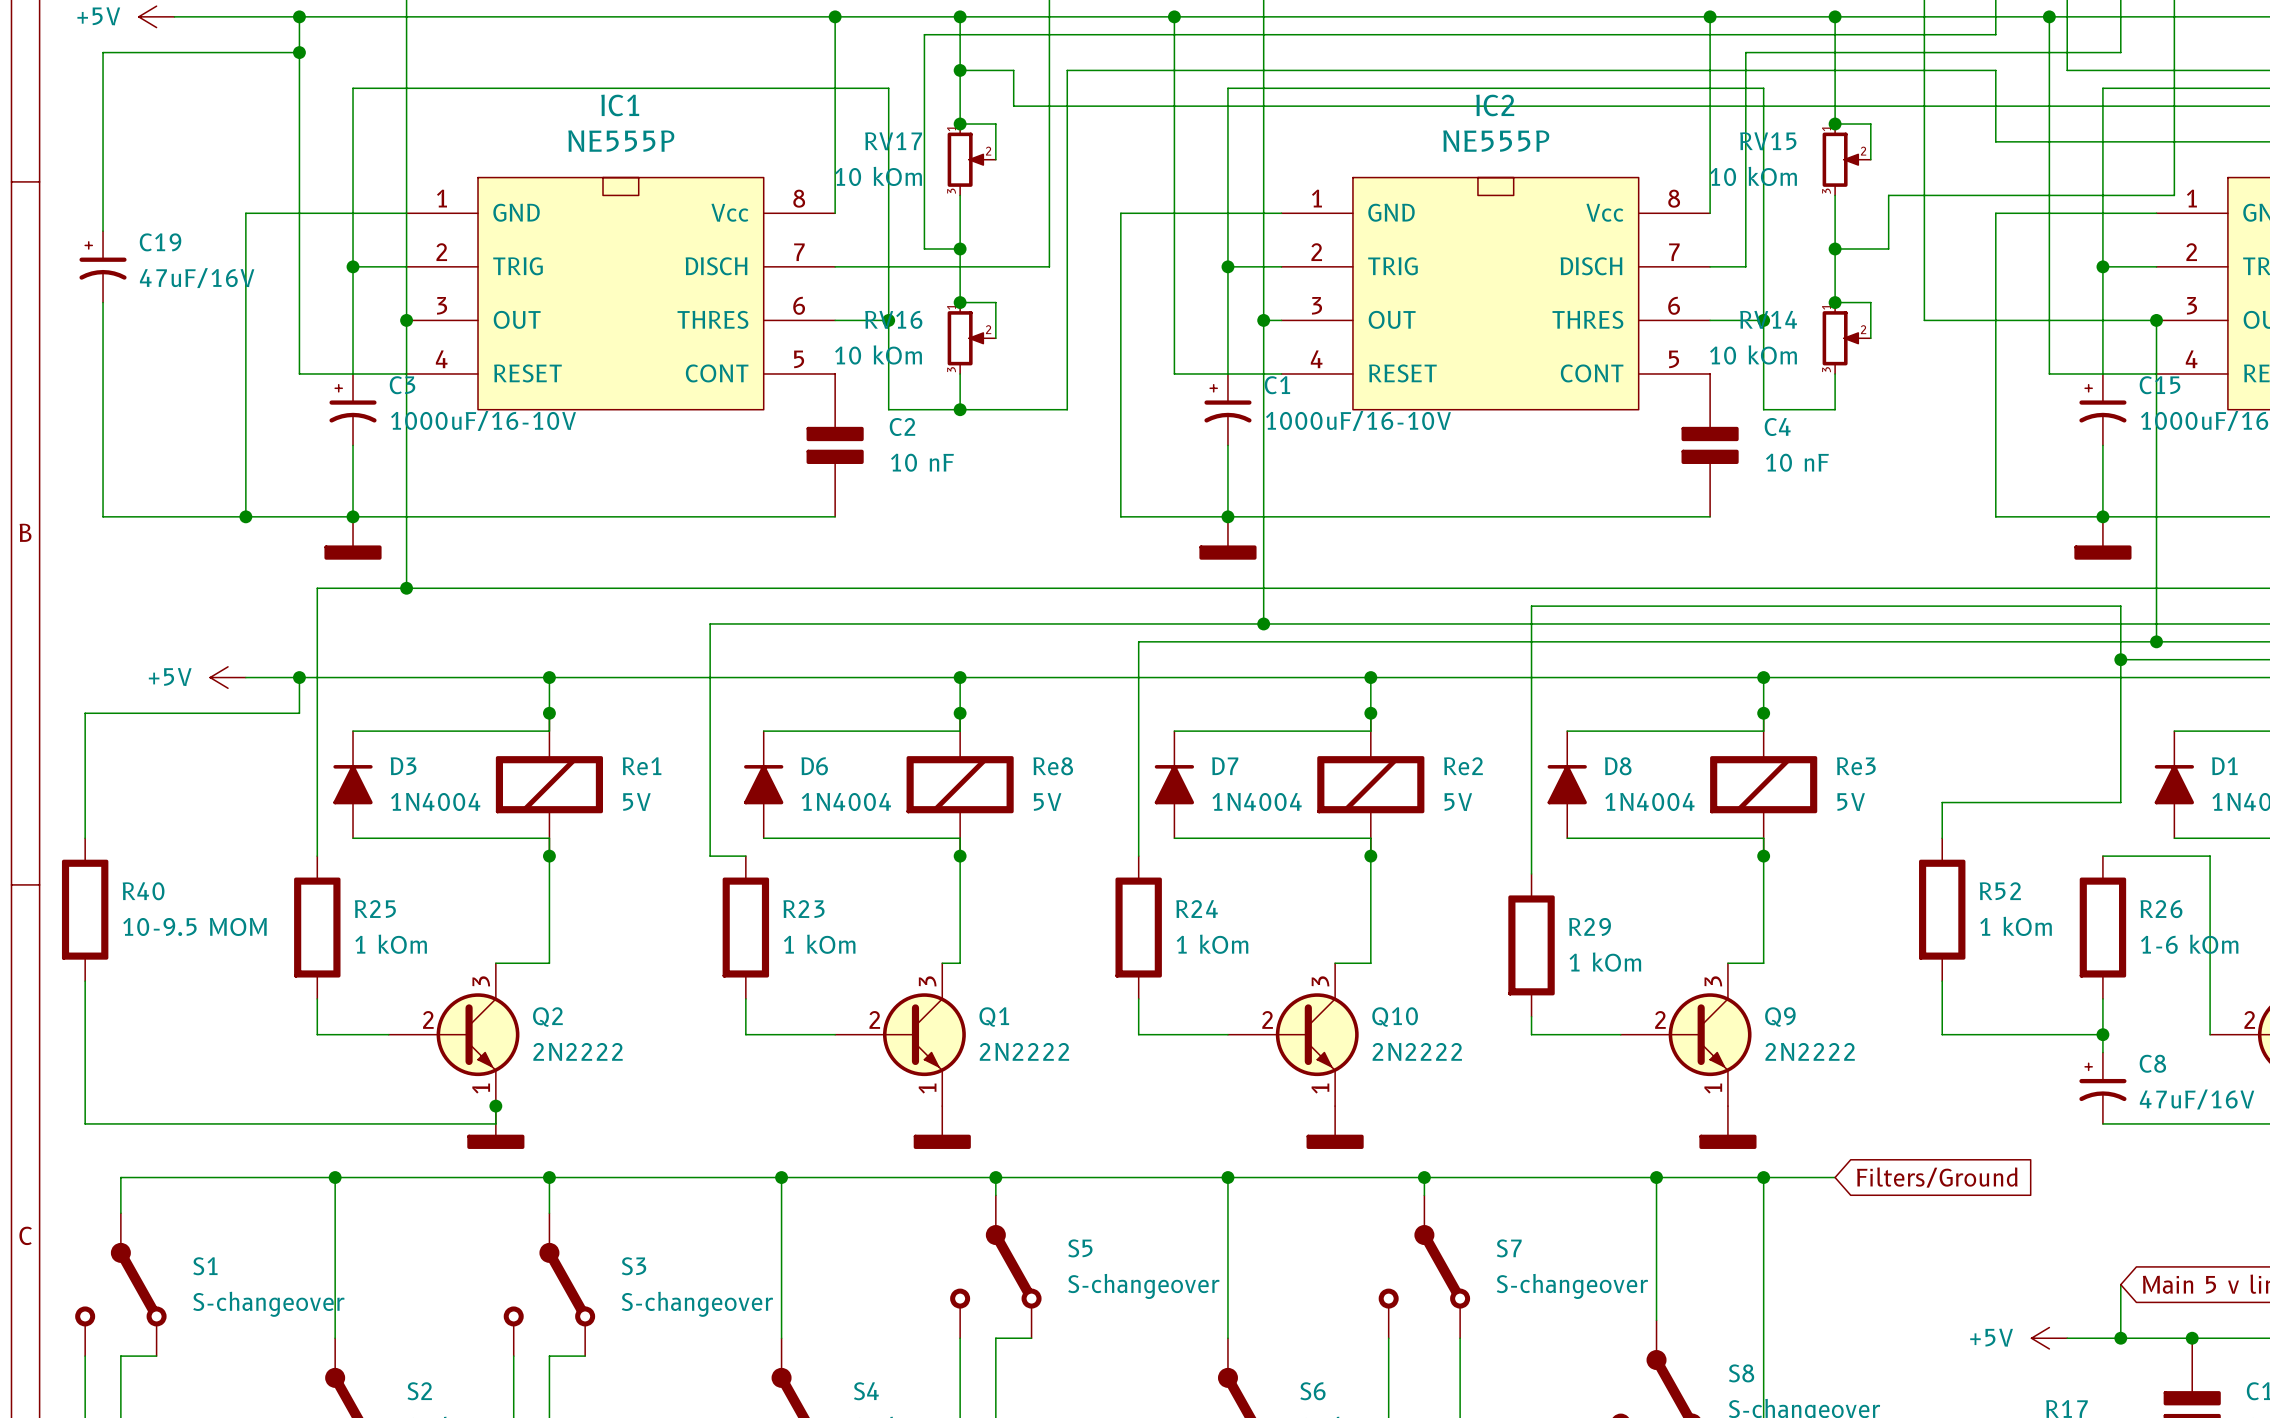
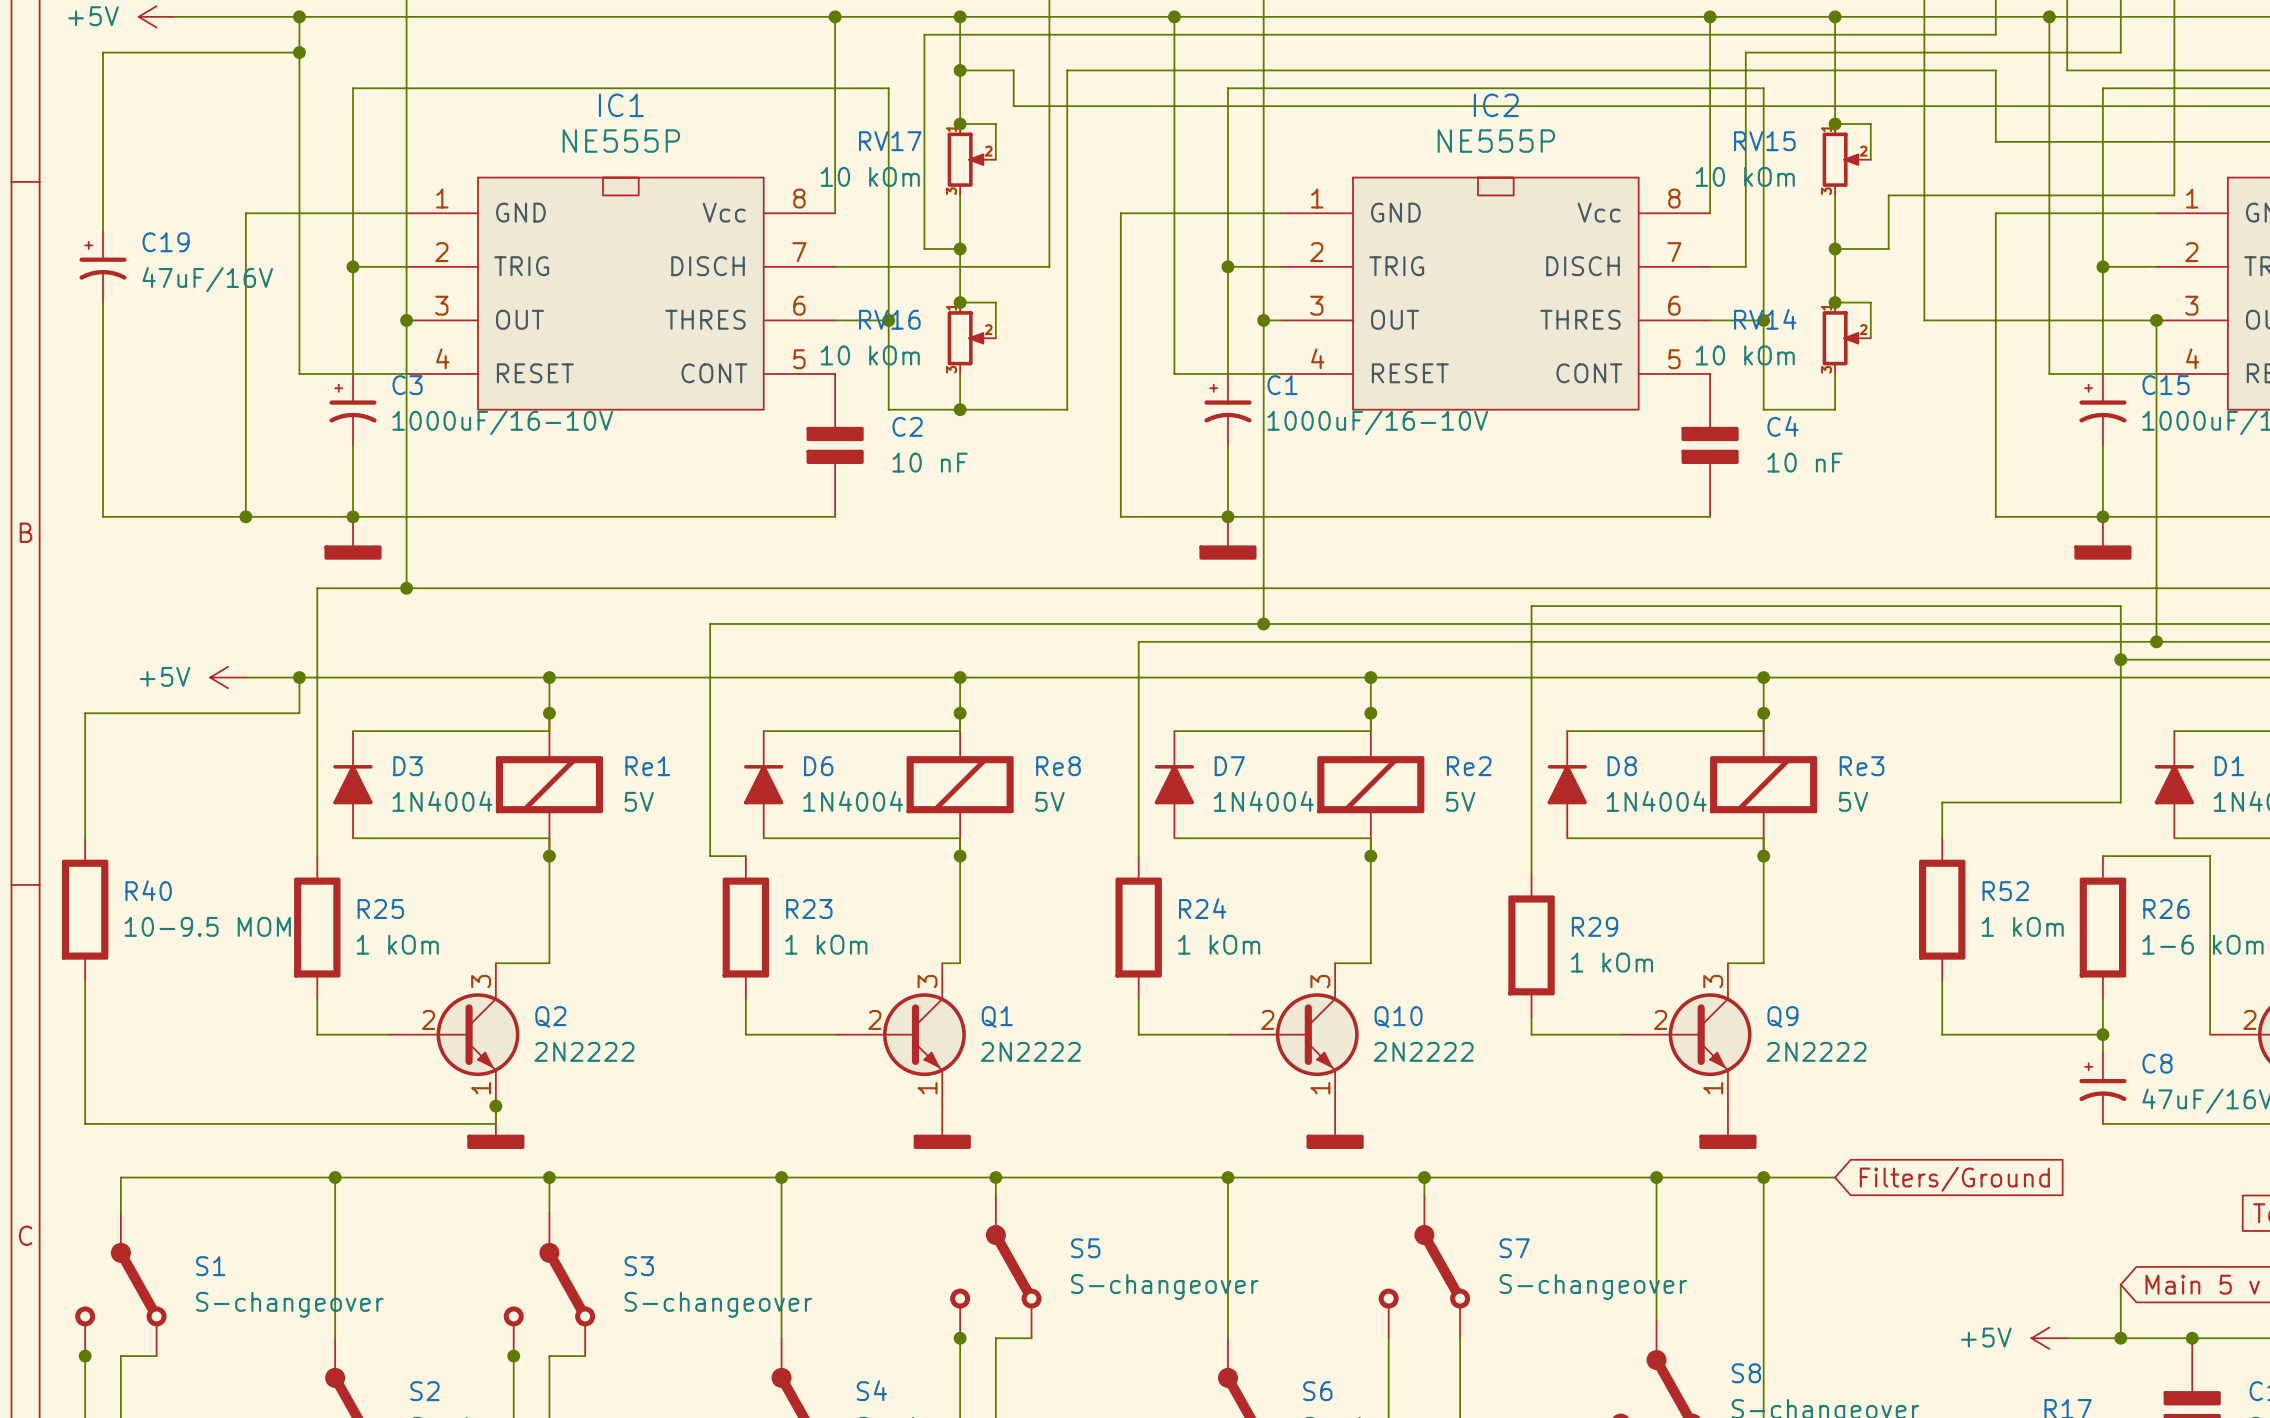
junction: none -> (960, 1338)
junction: none -> (85, 1356)
junction: none -> (513, 1356)

